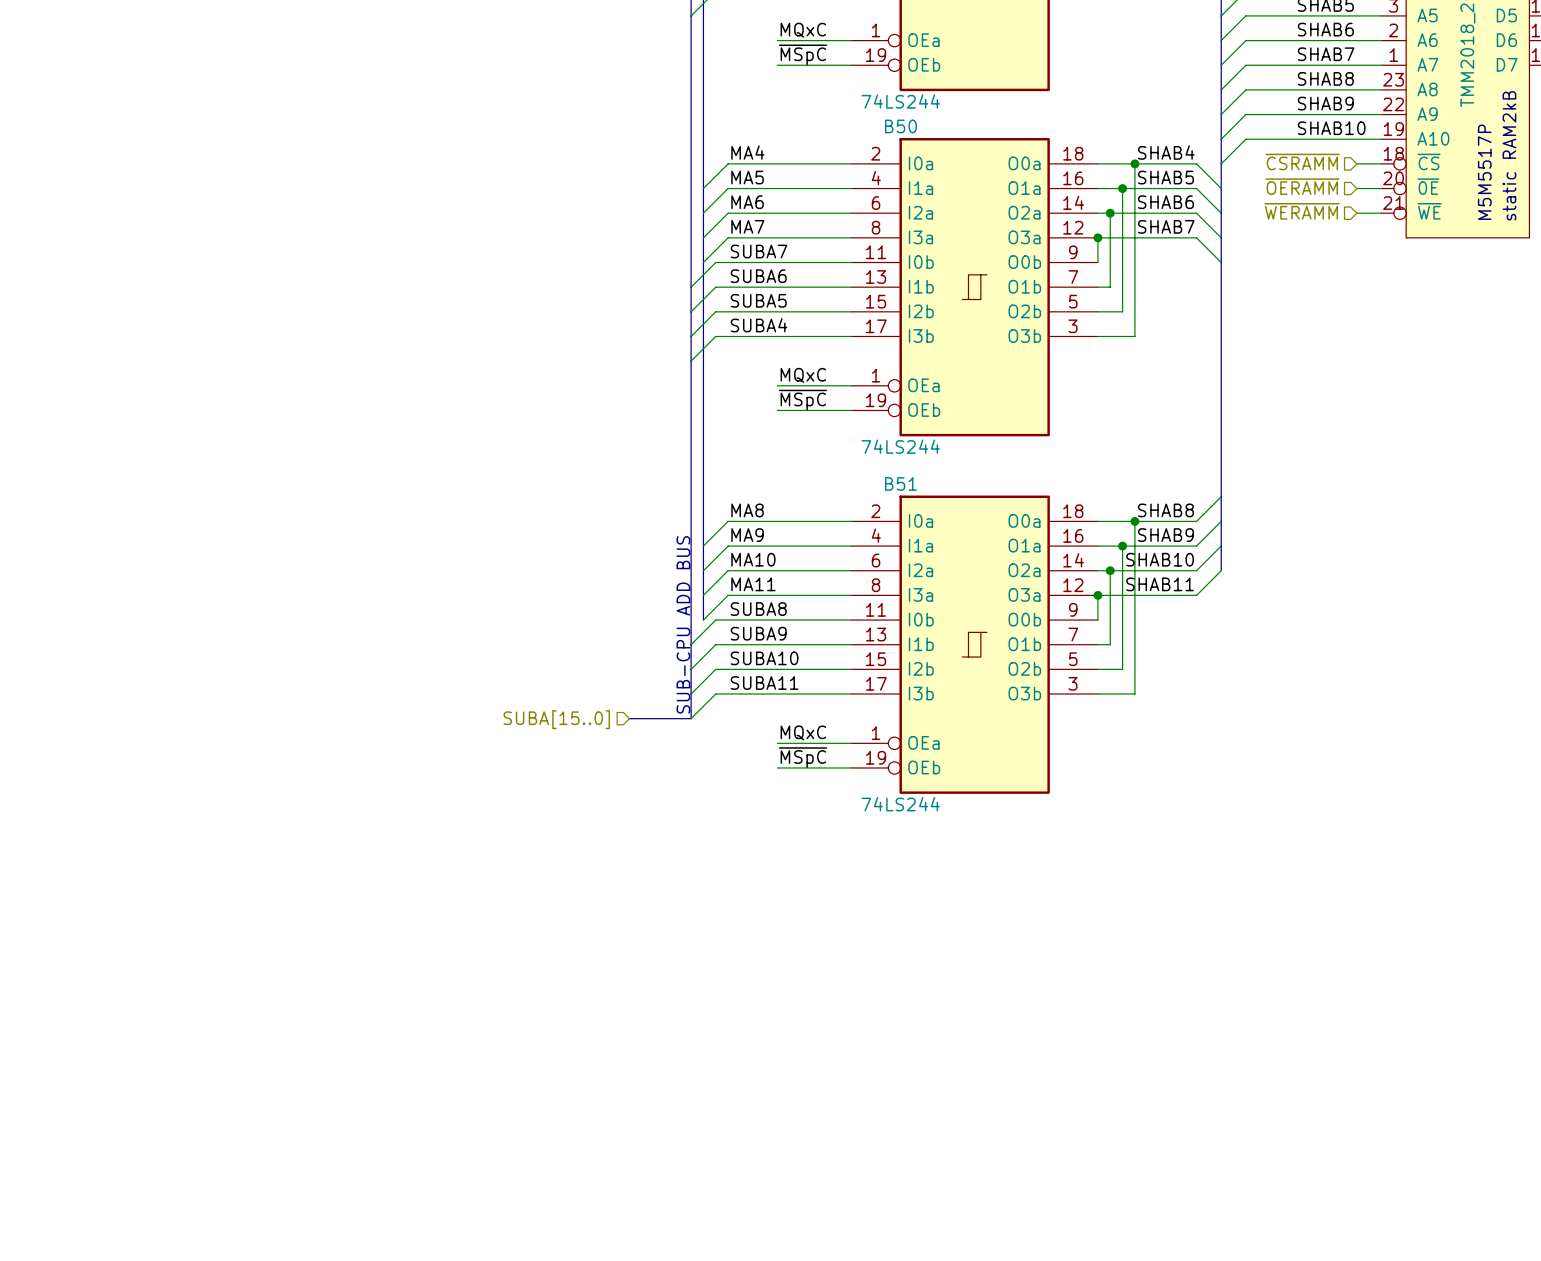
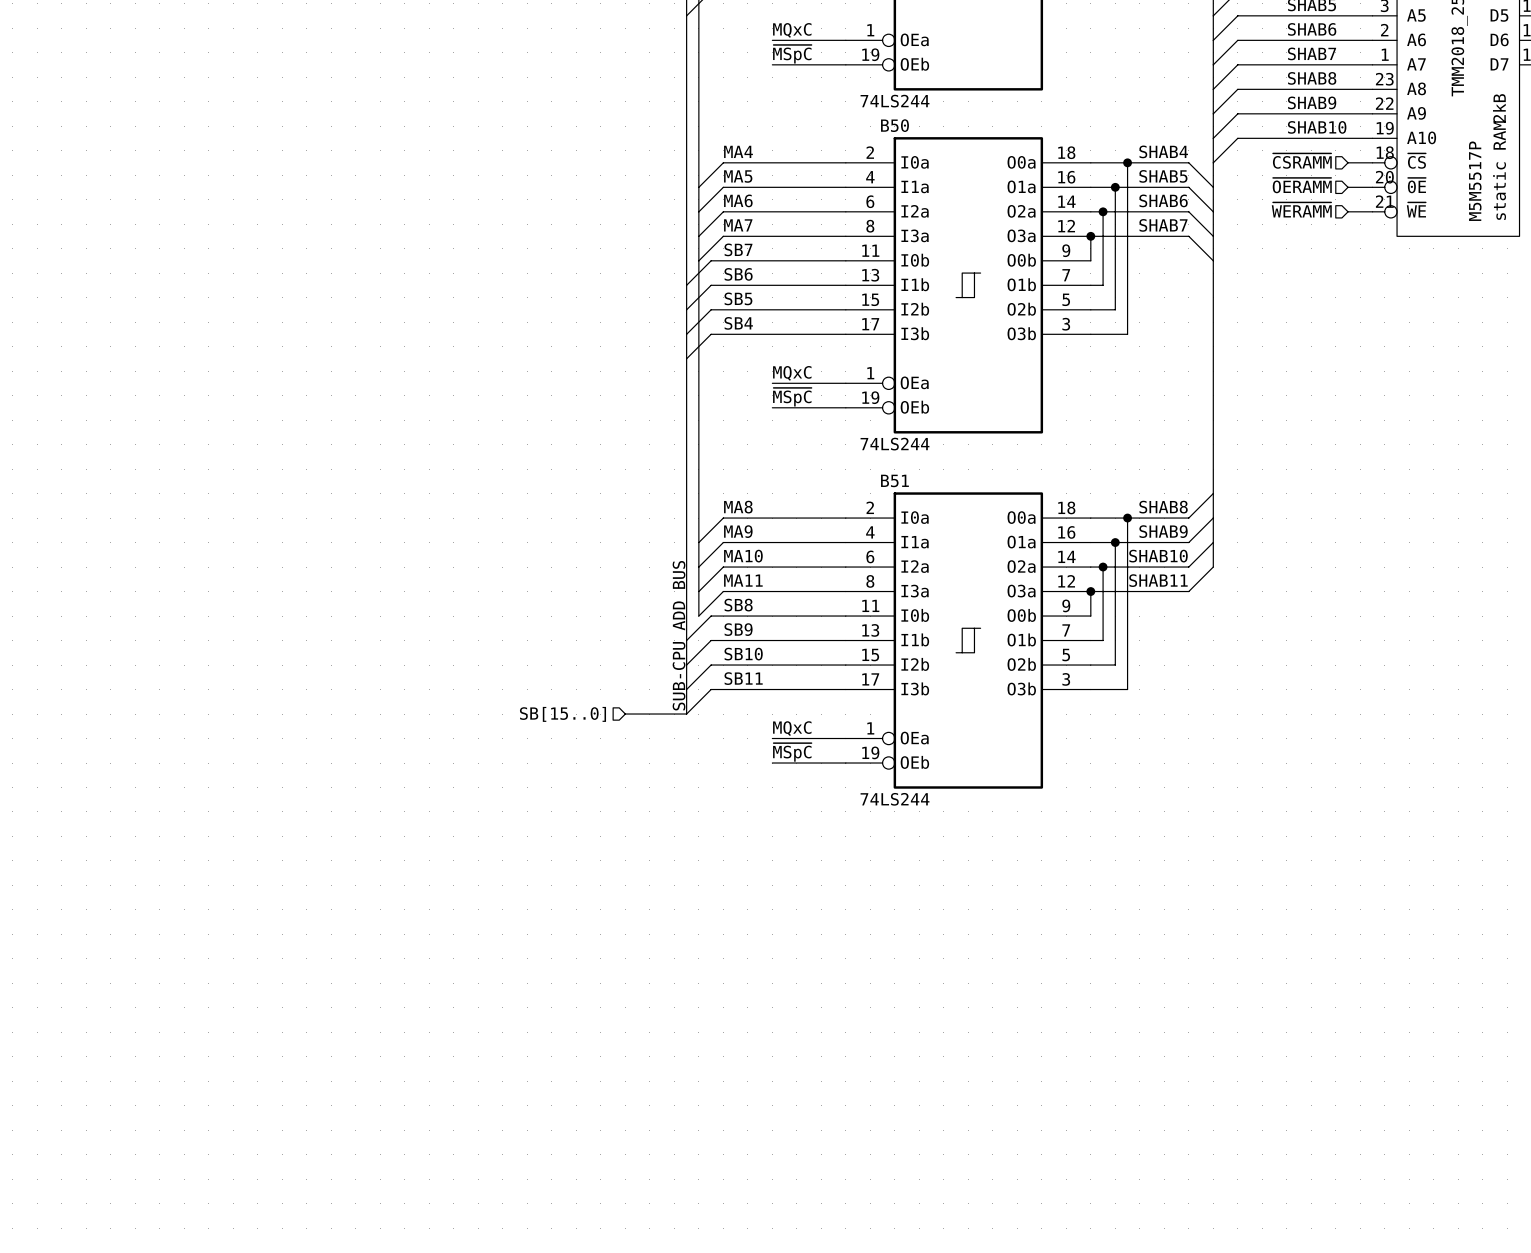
label: SUBA7 (759, 251) -> SB7 (738, 249)
label: SUBA6 (758, 276) -> SB6 (738, 274)
label: SUBA5 (758, 300) -> SB5 (738, 298)
label: SUBA4 (759, 325) -> SB4 (738, 323)
label: SUBA8 (758, 609) -> SB8 (738, 605)
label: SUBA9 (758, 633) -> SB9 (738, 629)
label: SUBA10 (764, 658) -> SB10 (743, 654)
label: SUBA11 (764, 683) -> SB11 (743, 678)
hierarchical label: SUBA[15..0] (556, 719) -> SB[15..0] (562, 714)

